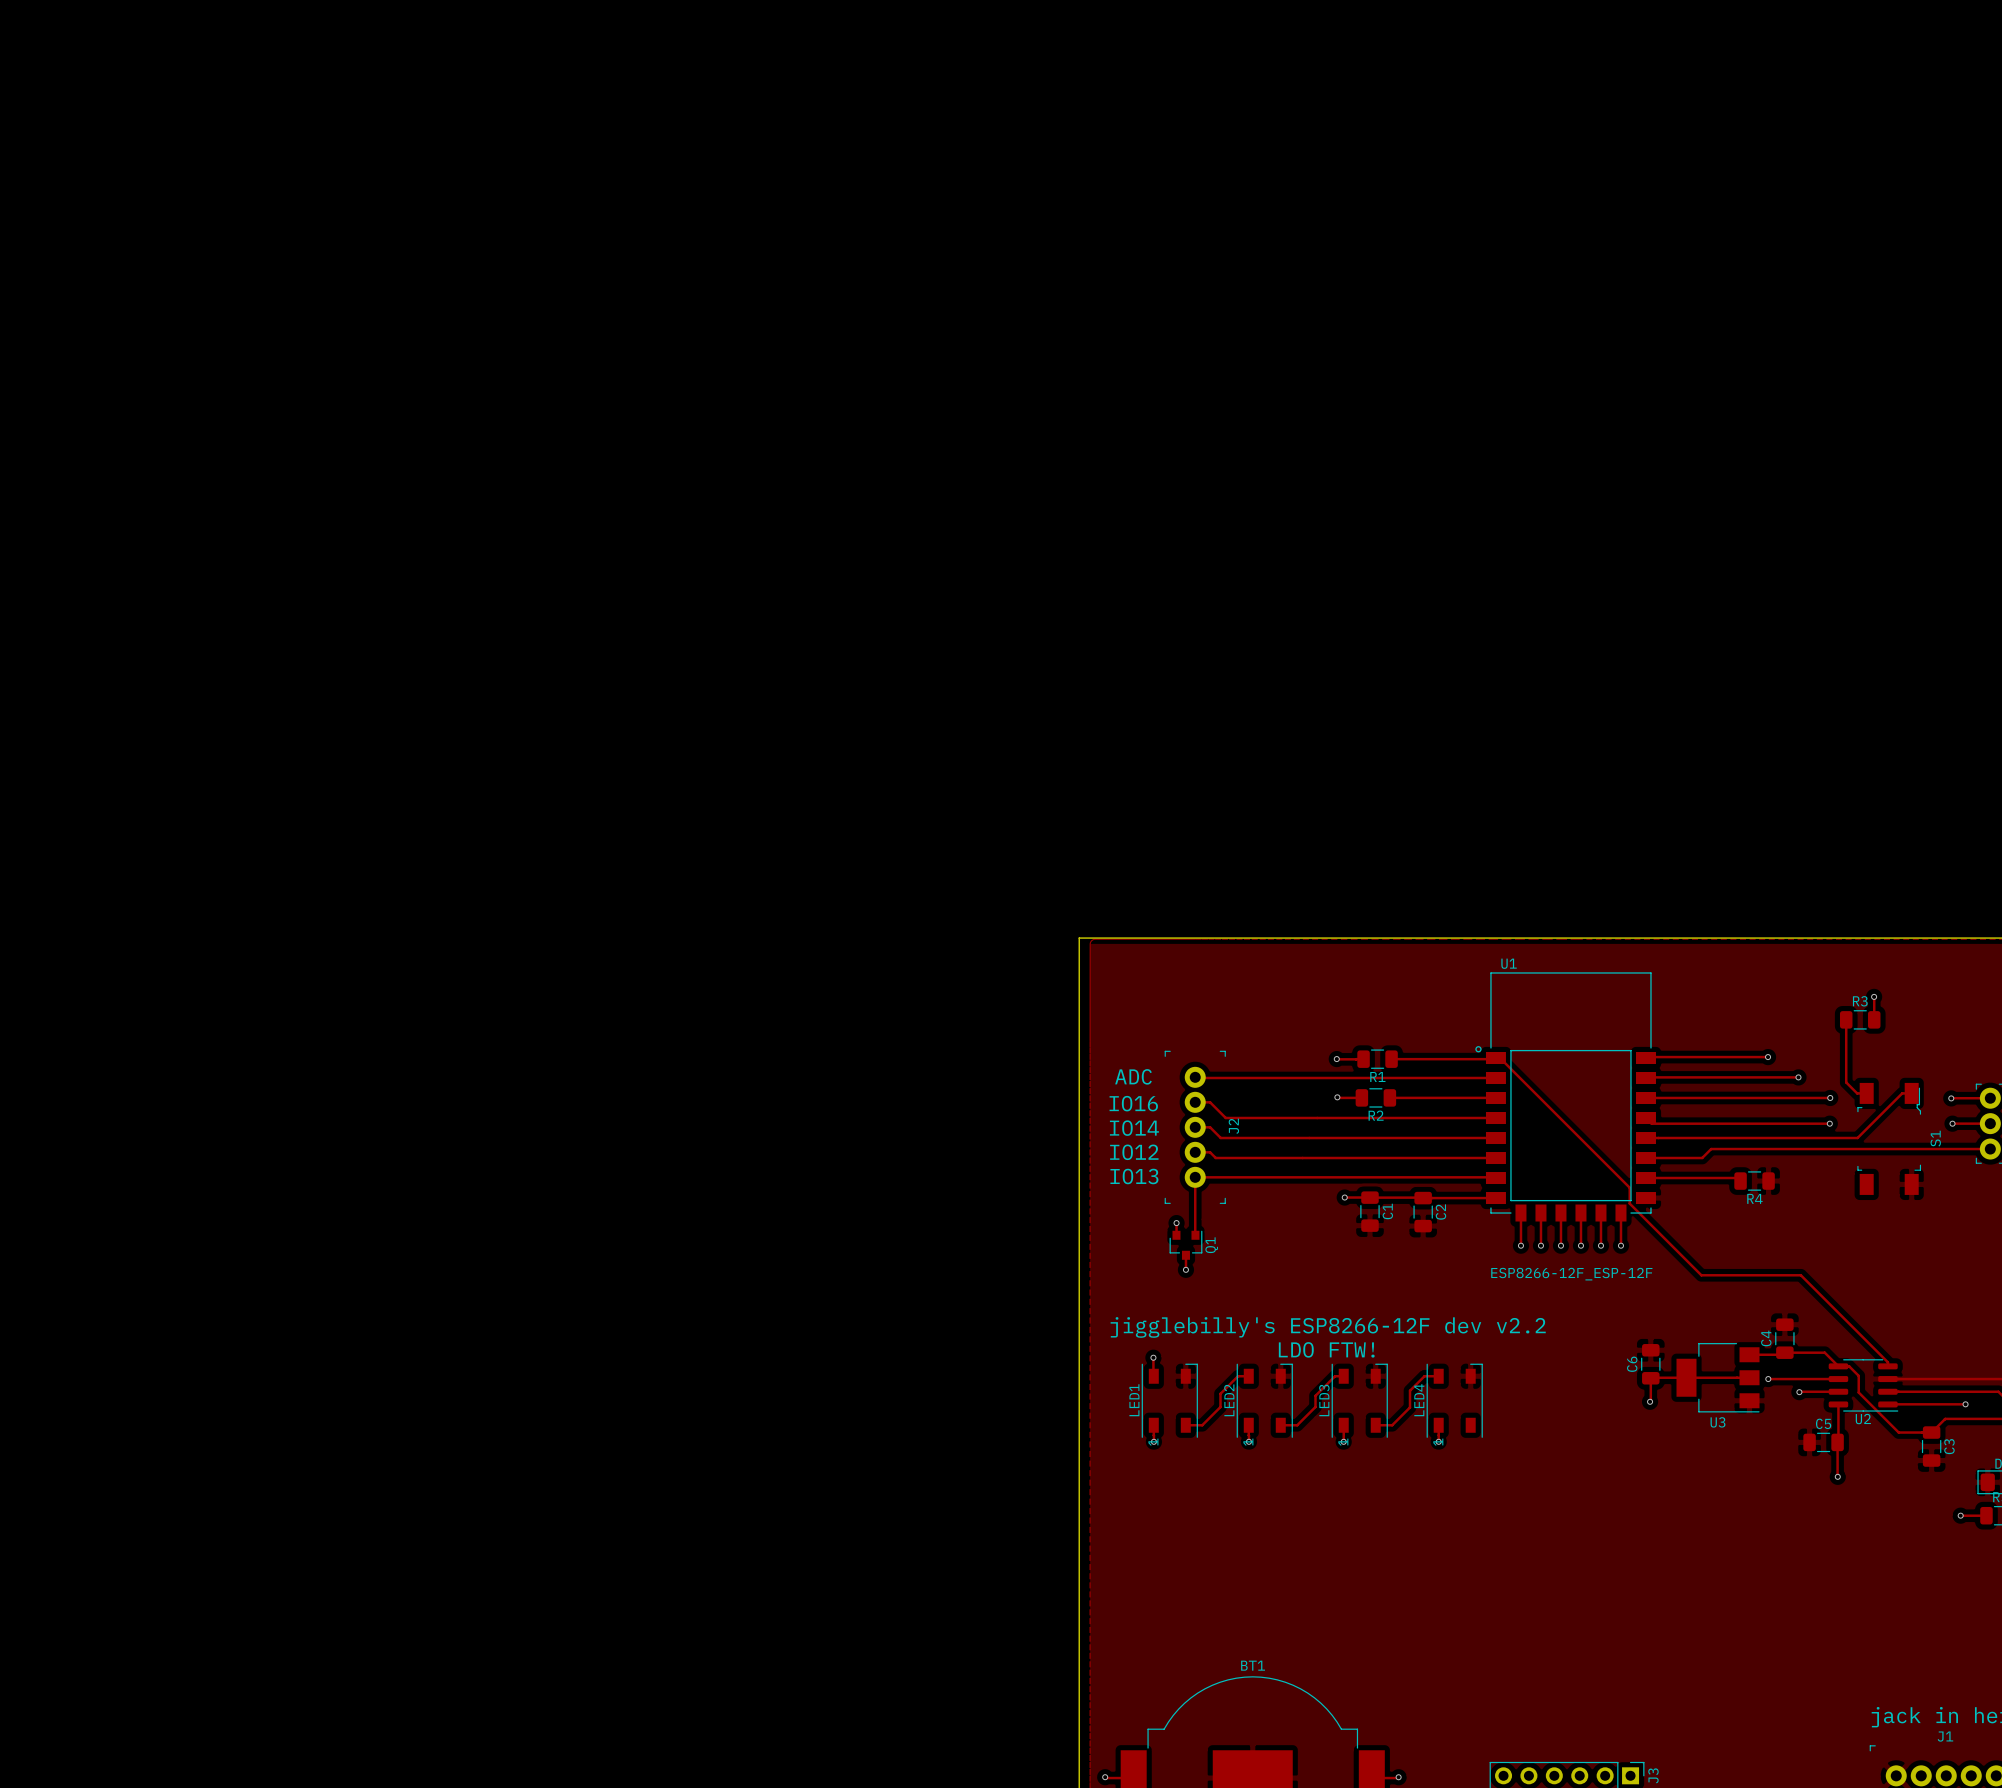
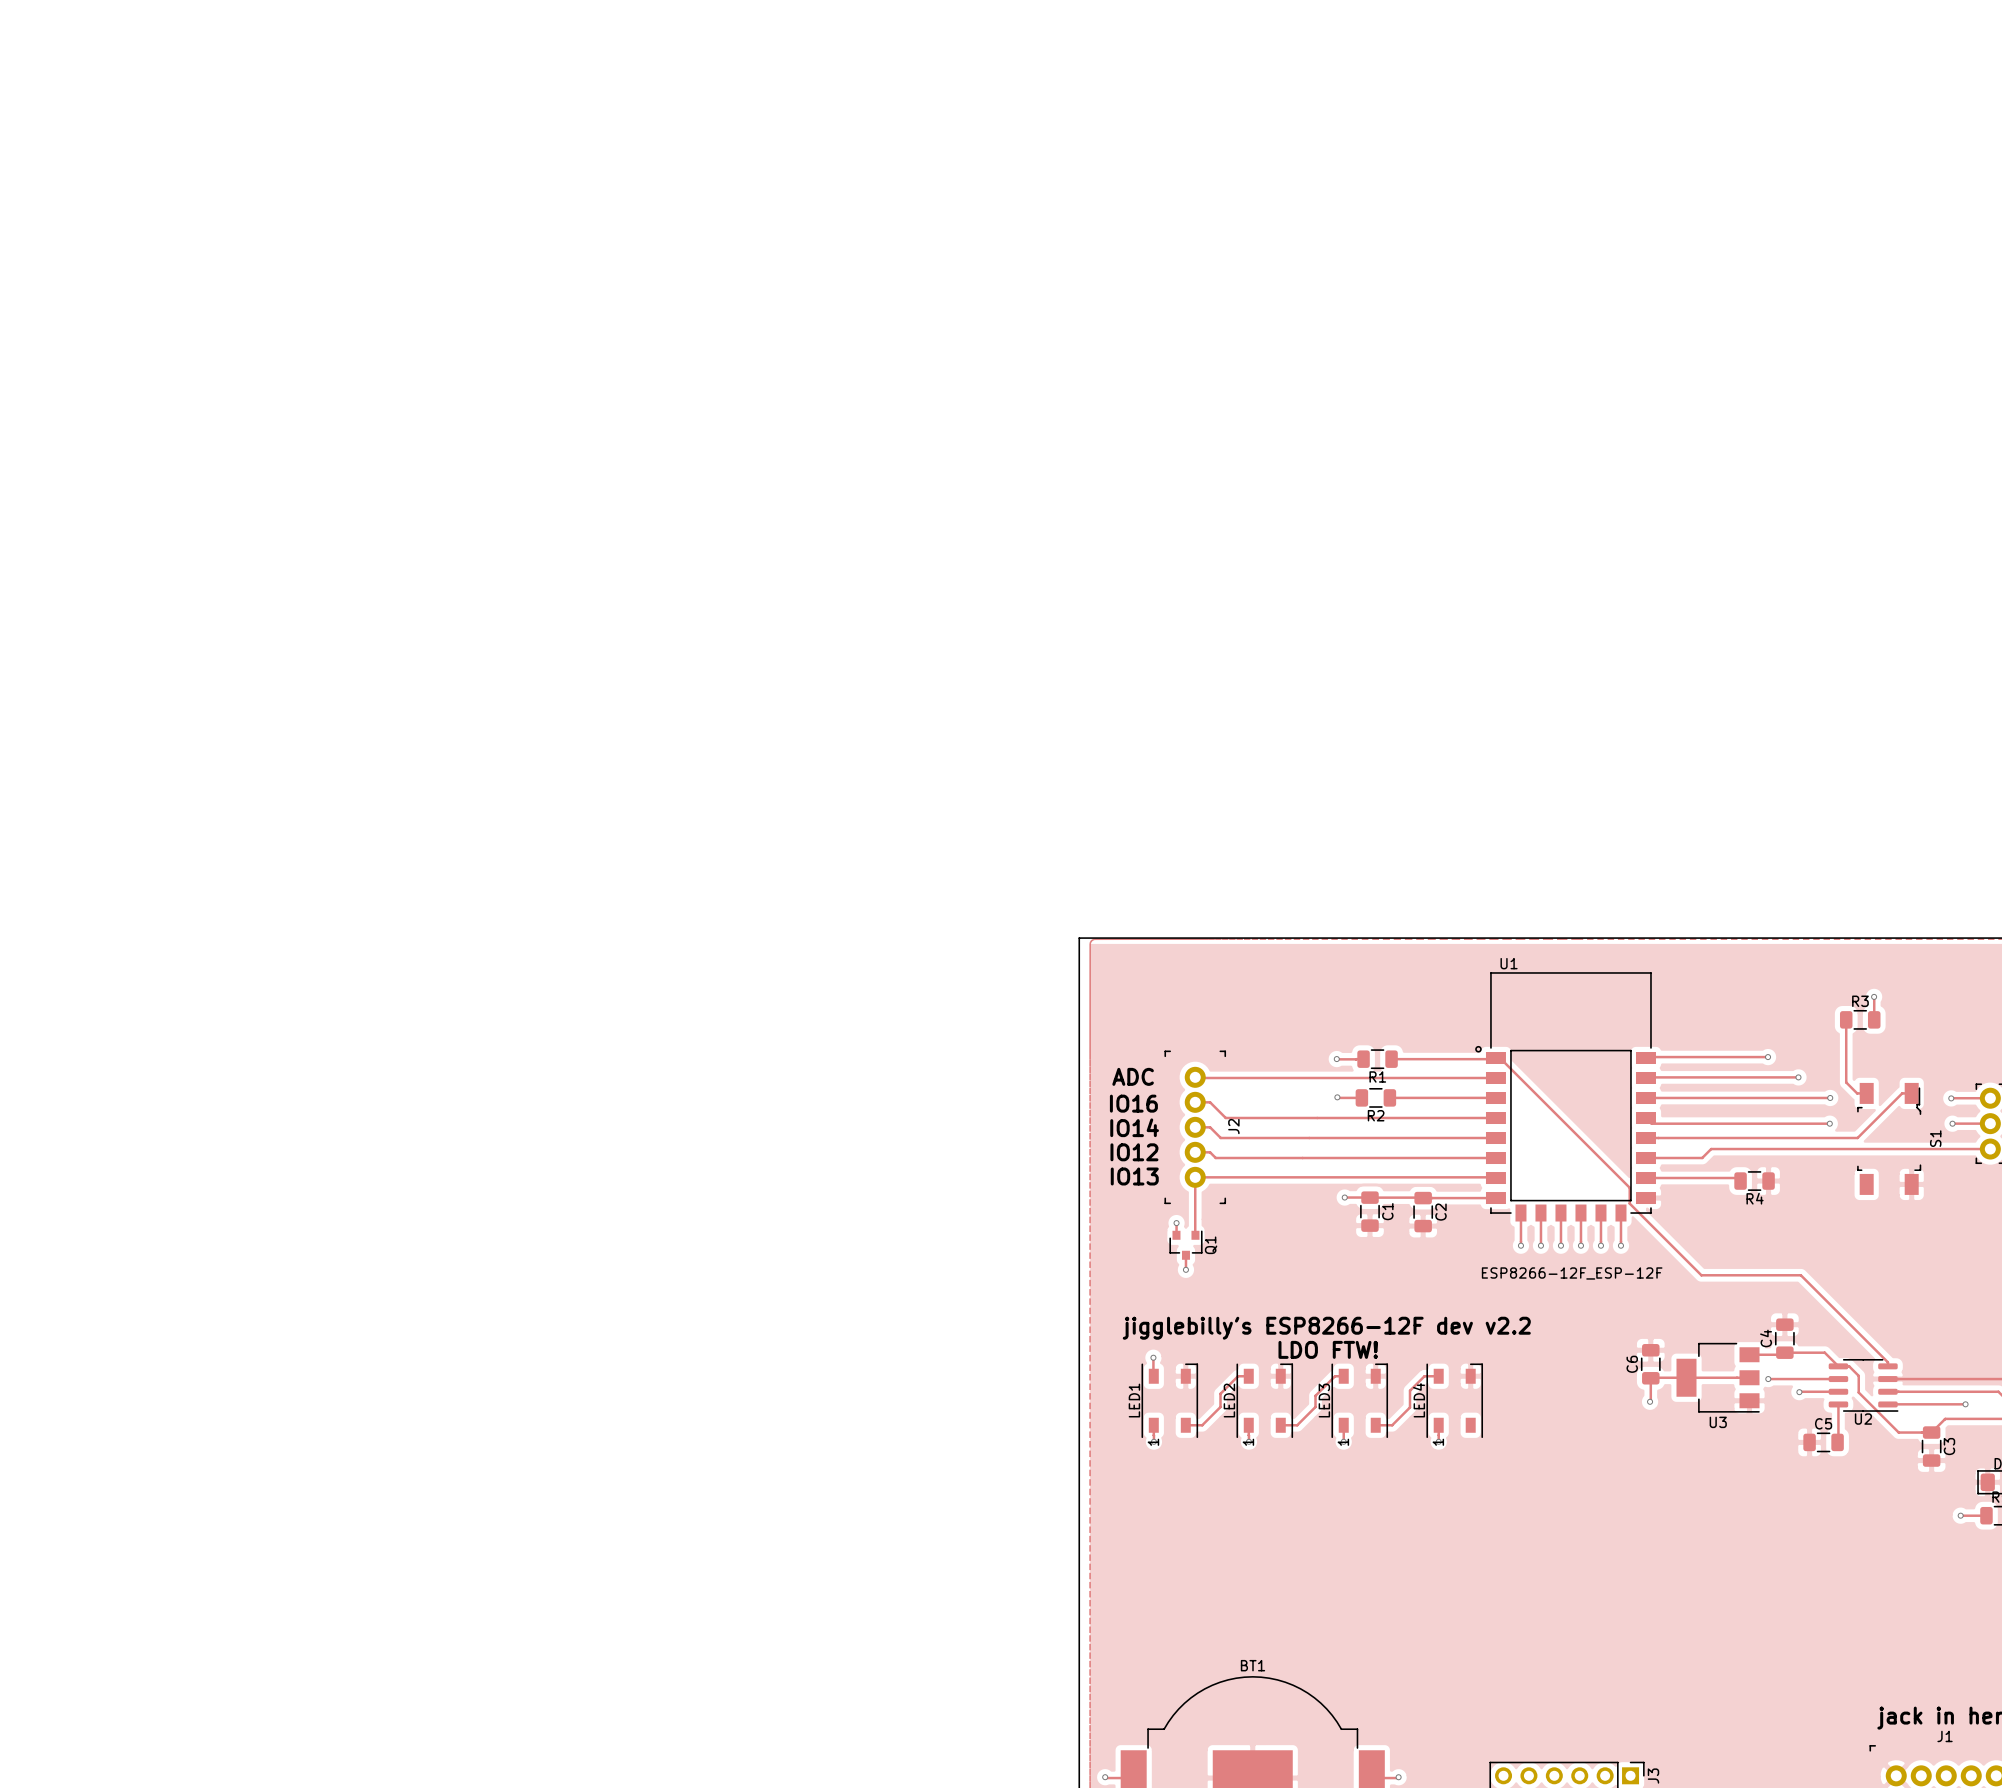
track: (1837, 1442) (1837, 1476) -> none
via: (1837, 1476) -> none

